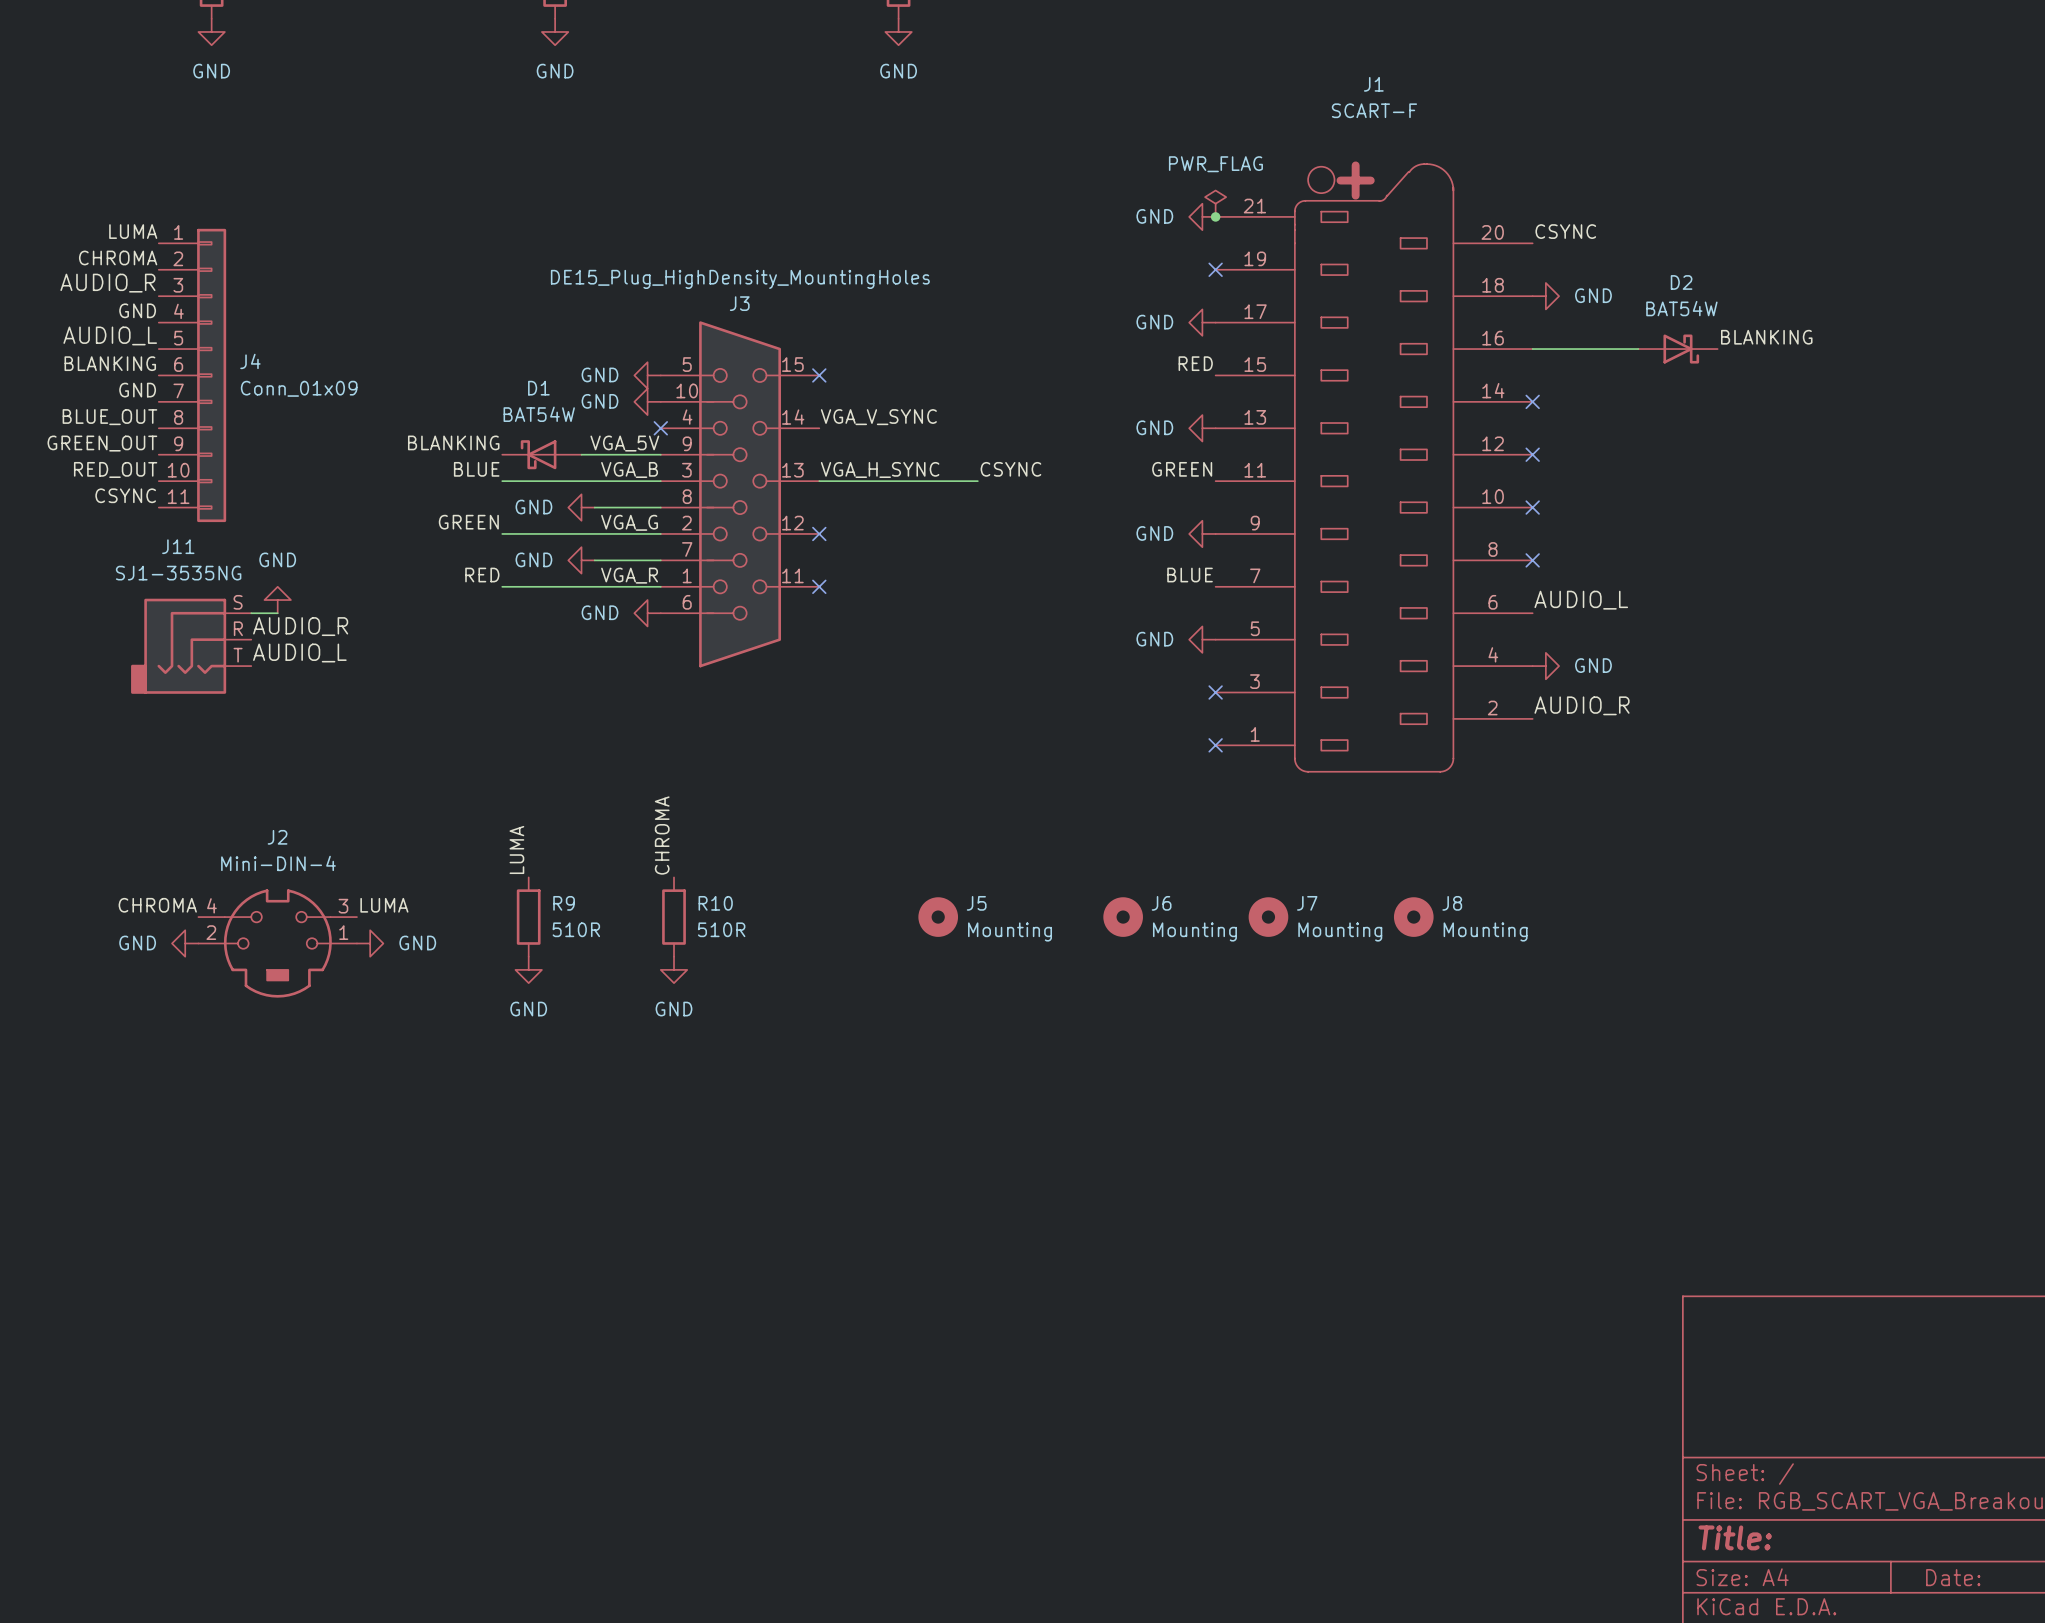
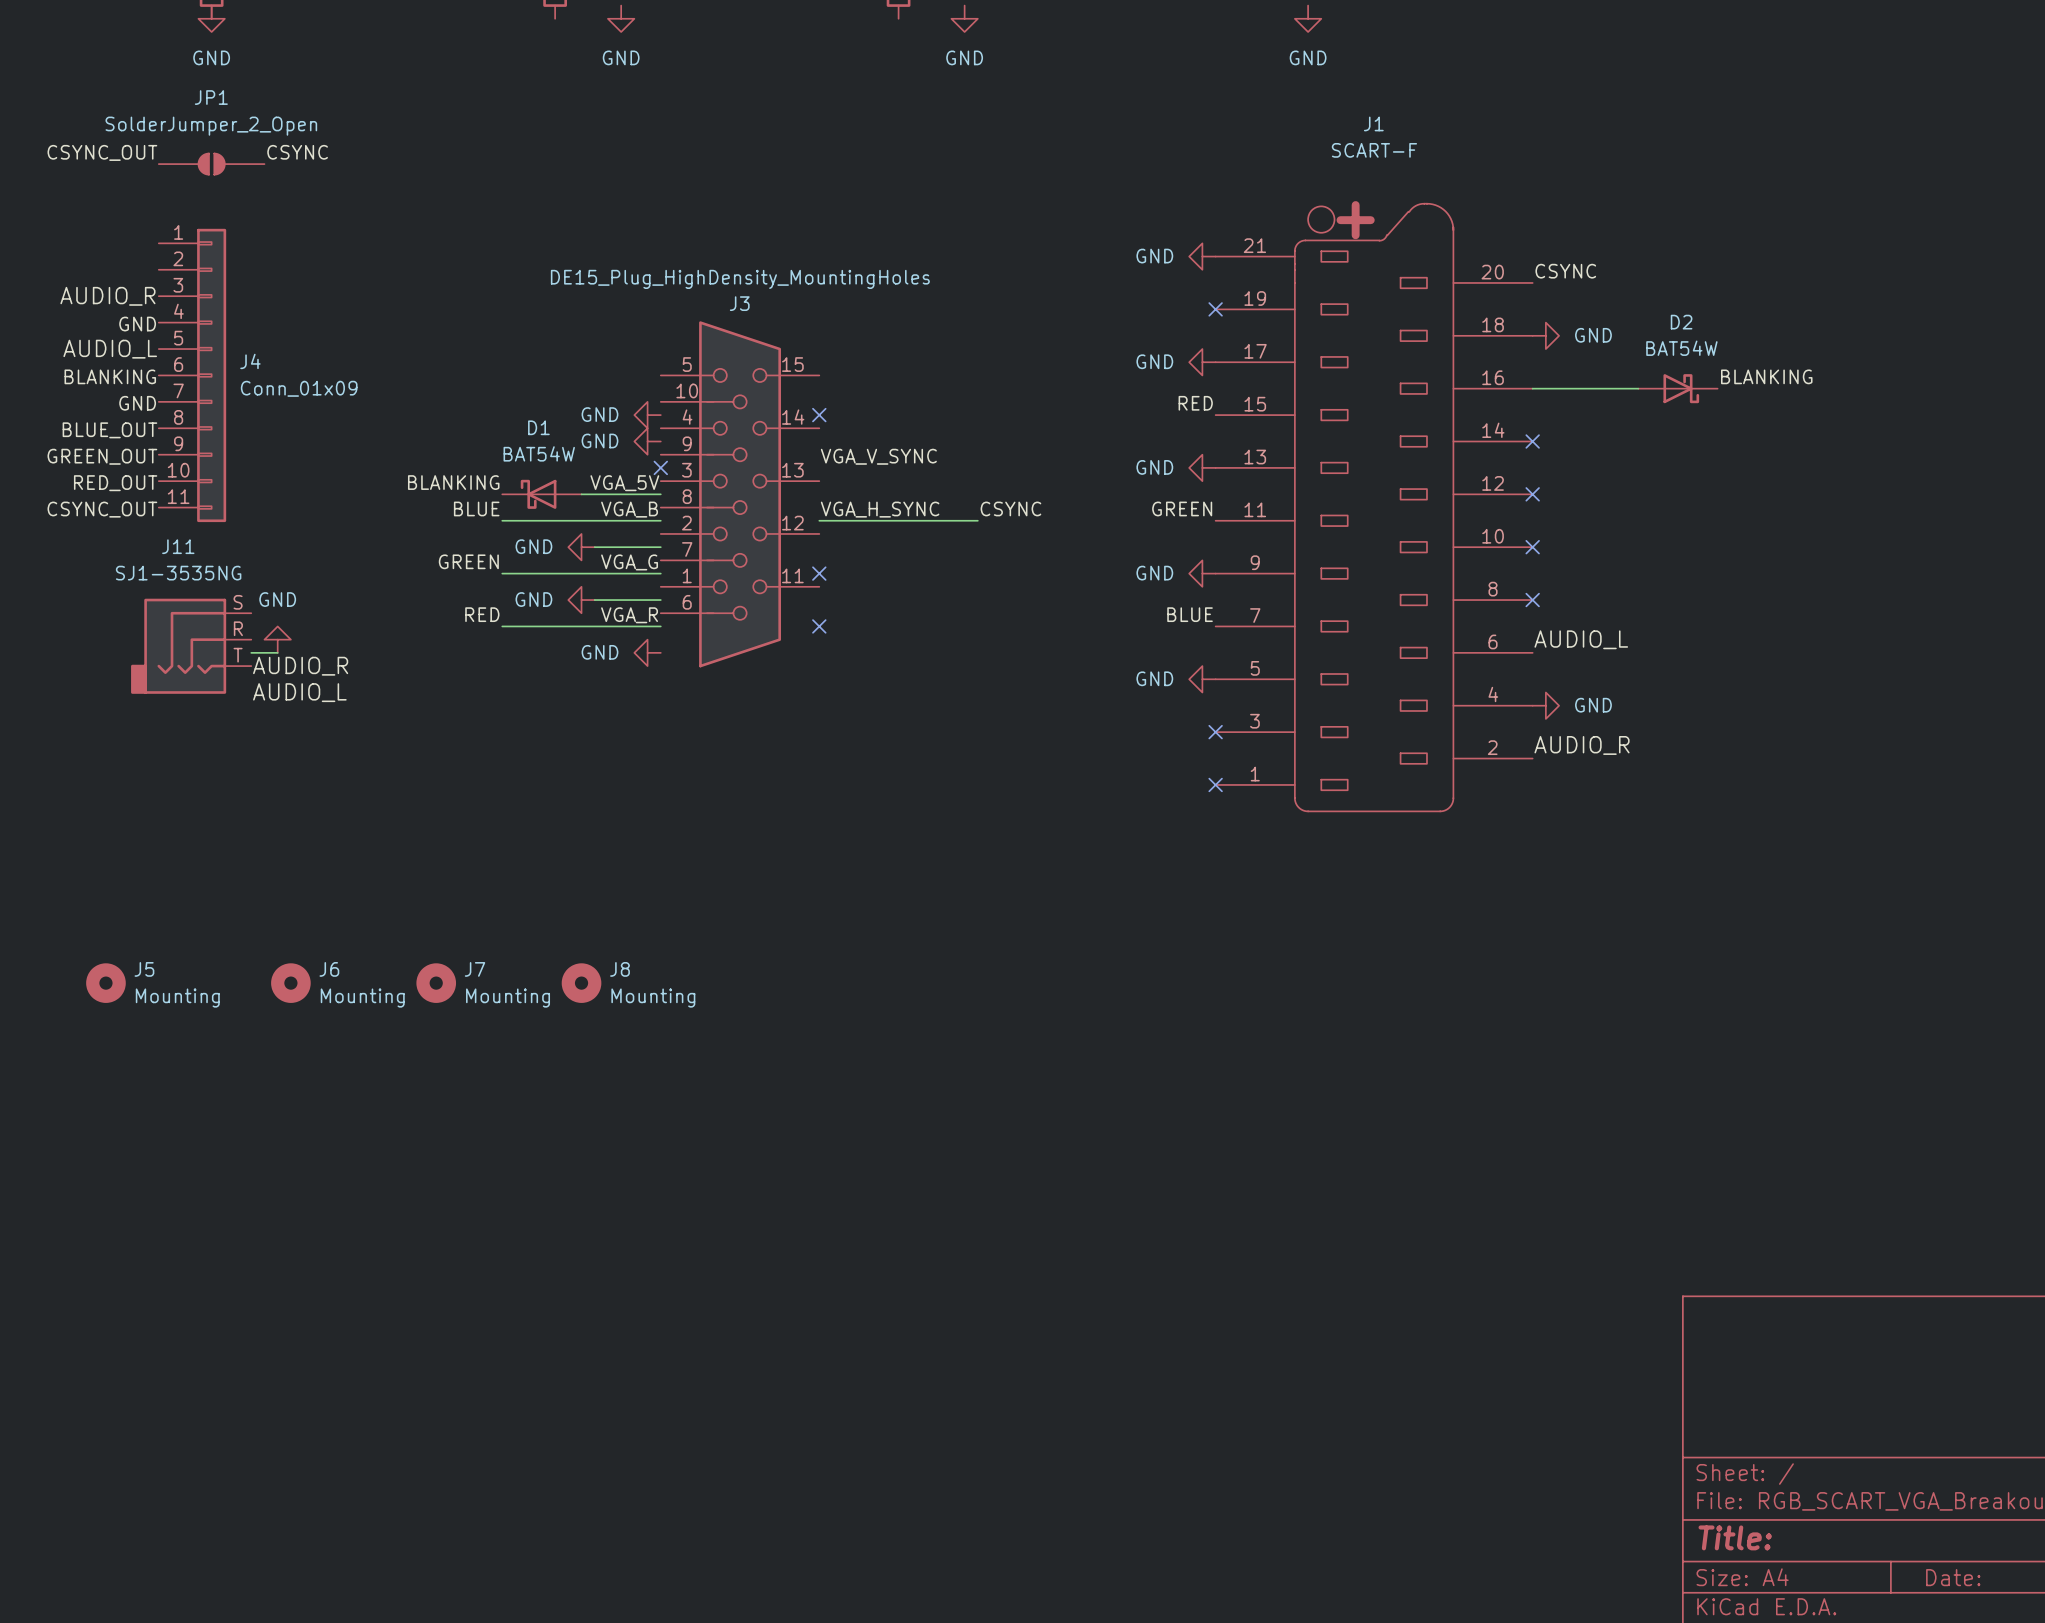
power symbol: none -> GND (1308, 18)
power symbol position: GND (211, 31) -> GND (211, 18)
power symbol position: GND (555, 31) -> GND (621, 18)
power symbol position: GND (898, 31) -> GND (964, 18)
label: none -> CSYNC_OUT (102, 152)
label: none -> CSYNC (297, 152)
JP1: none -> SolderJumper_2_Open (211, 164)
power symbol: PWR_FLAG (1215, 203) -> none
power symbol: GND (1202, 216) -> none
junction: (1215, 216) -> none
label: LUMA (133, 231) -> none
label position: CSYNC (1565, 231) -> CSYNC (1565, 271)
power symbol: none -> GND (1202, 256)
label: CHROMA (118, 257) -> none
no-connect mark position: (1215, 269) -> (1215, 309)
label position: AUDIO_R (107, 283) -> AUDIO_R (107, 296)
power symbol position: GND (1545, 296) -> GND (1545, 335)
label position: GND (137, 310) -> GND (137, 324)
power symbol: GND (1202, 322) -> none
label position: AUDIO_L (110, 335) -> AUDIO_L (110, 349)
label position: BLANKING (1766, 337) -> BLANKING (1766, 376)
wire: (1532, 349) (1638, 349) -> (1532, 388) (1638, 388)
D2 position: (1677, 349) -> (1677, 388)
power symbol: none -> GND (1202, 362)
label position: BLANKING (110, 363) -> BLANKING (110, 376)
label position: RED (1195, 363) -> RED (1195, 403)
power symbol: GND (647, 375) -> none
no-connect mark position: (819, 375) -> (819, 415)
label position: GND (137, 390) -> GND (137, 403)
power symbol position: GND (647, 401) -> GND (647, 415)
no-connect mark: (1532, 401) -> none
label position: BLUE_OUT (109, 417) -> BLUE_OUT (109, 430)
label position: VGA_V_SYNC (878, 417) -> VGA_V_SYNC (878, 456)
no-connect mark position: (660, 428) -> (660, 467)
power symbol: GND (1202, 428) -> none
power symbol: none -> GND (647, 441)
label position: BLANKING (453, 442) -> BLANKING (453, 482)
label position: GREEN_OUT (102, 443) -> GREEN_OUT (102, 456)
label position: VGA_5V (624, 443) -> VGA_5V (624, 483)
D1 position: (541, 454) -> (541, 494)
wire: (581, 454) (660, 454) -> (581, 494) (660, 494)
no-connect mark position: (1532, 454) -> (1532, 441)
power symbol: none -> GND (1202, 467)
J1 position: (1374, 467) -> (1374, 507)
label position: RED_OUT (115, 469) -> RED_OUT (115, 483)
label position: BLUE (476, 469) -> BLUE (476, 508)
label position: VGA_B (629, 469) -> VGA_B (629, 509)
label position: VGA_H_SYNC (880, 469) -> VGA_H_SYNC (880, 509)
label position: CSYNC (1010, 469) -> CSYNC (1010, 508)
label position: GREEN (1182, 469) -> GREEN (1182, 508)
wire: (502, 481) (660, 481) -> (502, 520) (660, 520)
wire: (819, 481) (977, 481) -> (819, 520) (977, 520)
label: CSYNC (125, 495) -> CSYNC_OUT (102, 509)
power symbol: GND (581, 507) -> none
wire: (594, 507) (660, 507) -> (594, 547) (660, 547)
no-connect mark position: (1532, 507) -> (1532, 494)
label position: GREEN (468, 522) -> GREEN (468, 561)
label position: VGA_G (629, 522) -> VGA_G (629, 562)
wire: (502, 533) (660, 533) -> (502, 573) (660, 573)
no-connect mark: (819, 533) -> none
power symbol: GND (1202, 533) -> none
power symbol position: GND (581, 560) -> GND (581, 547)
wire: (594, 560) (660, 560) -> (594, 600) (660, 600)
no-connect mark position: (1532, 560) -> (1532, 547)
power symbol: none -> GND (1202, 573)
label position: RED (482, 575) -> RED (482, 614)
label position: VGA_R (629, 575) -> VGA_R (629, 615)
label position: BLUE (1190, 575) -> BLUE (1190, 614)
wire: (502, 586) (660, 586) -> (502, 626) (660, 626)
no-connect mark position: (819, 586) -> (819, 573)
power symbol position: GND (277, 600) -> GND (277, 639)
power symbol: none -> GND (581, 600)
no-connect mark: none -> (1532, 600)
label position: AUDIO_L (1581, 600) -> AUDIO_L (1581, 639)
wire: (251, 613) (277, 613) -> (251, 652) (277, 652)
power symbol: GND (647, 613) -> none
label position: AUDIO_R (300, 626) -> AUDIO_R (300, 666)
no-connect mark: none -> (819, 626)
power symbol: GND (1202, 639) -> none
power symbol: none -> GND (647, 652)
label position: AUDIO_L (299, 653) -> AUDIO_L (299, 692)
power symbol position: GND (1545, 666) -> GND (1545, 705)
power symbol: none -> GND (1202, 679)
no-connect mark: (1215, 692) -> none
label position: AUDIO_R (1582, 705) -> AUDIO_R (1582, 745)
no-connect mark position: (1215, 745) -> (1215, 732)
no-connect mark: none -> (1215, 784)
label: CHROMA (662, 835) -> none
label: LUMA (516, 849) -> none
label: CHROMA (157, 905) -> none
label: LUMA (384, 905) -> none
R9: 510R (528, 917) -> none
R10: 510R (674, 917) -> none
J5 position: (938, 917) -> (105, 983)
J6 position: (1123, 917) -> (290, 983)
J7 position: (1268, 917) -> (436, 983)
J8 position: (1413, 917) -> (581, 983)
power symbol: GND (185, 943) -> none
J2: Mini-DIN-4 (277, 943) -> none
power symbol: GND (370, 943) -> none
power symbol: GND (528, 969) -> none
power symbol: GND (674, 969) -> none

